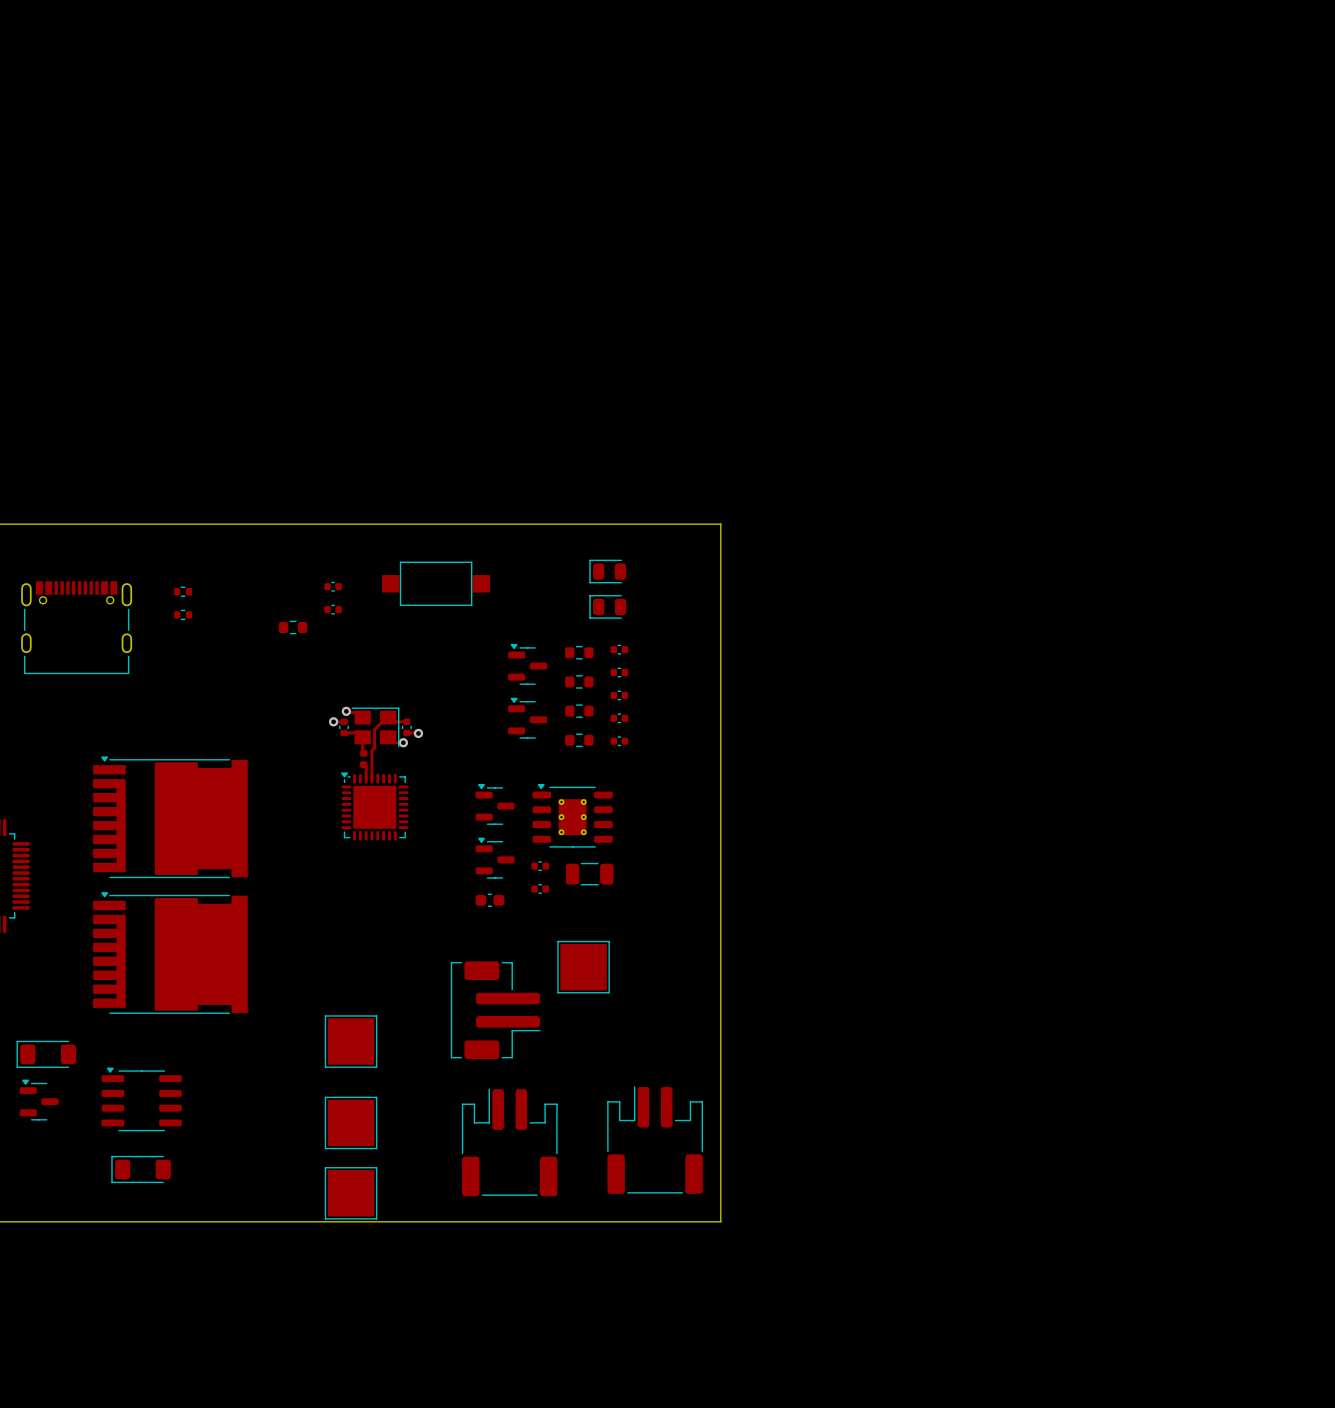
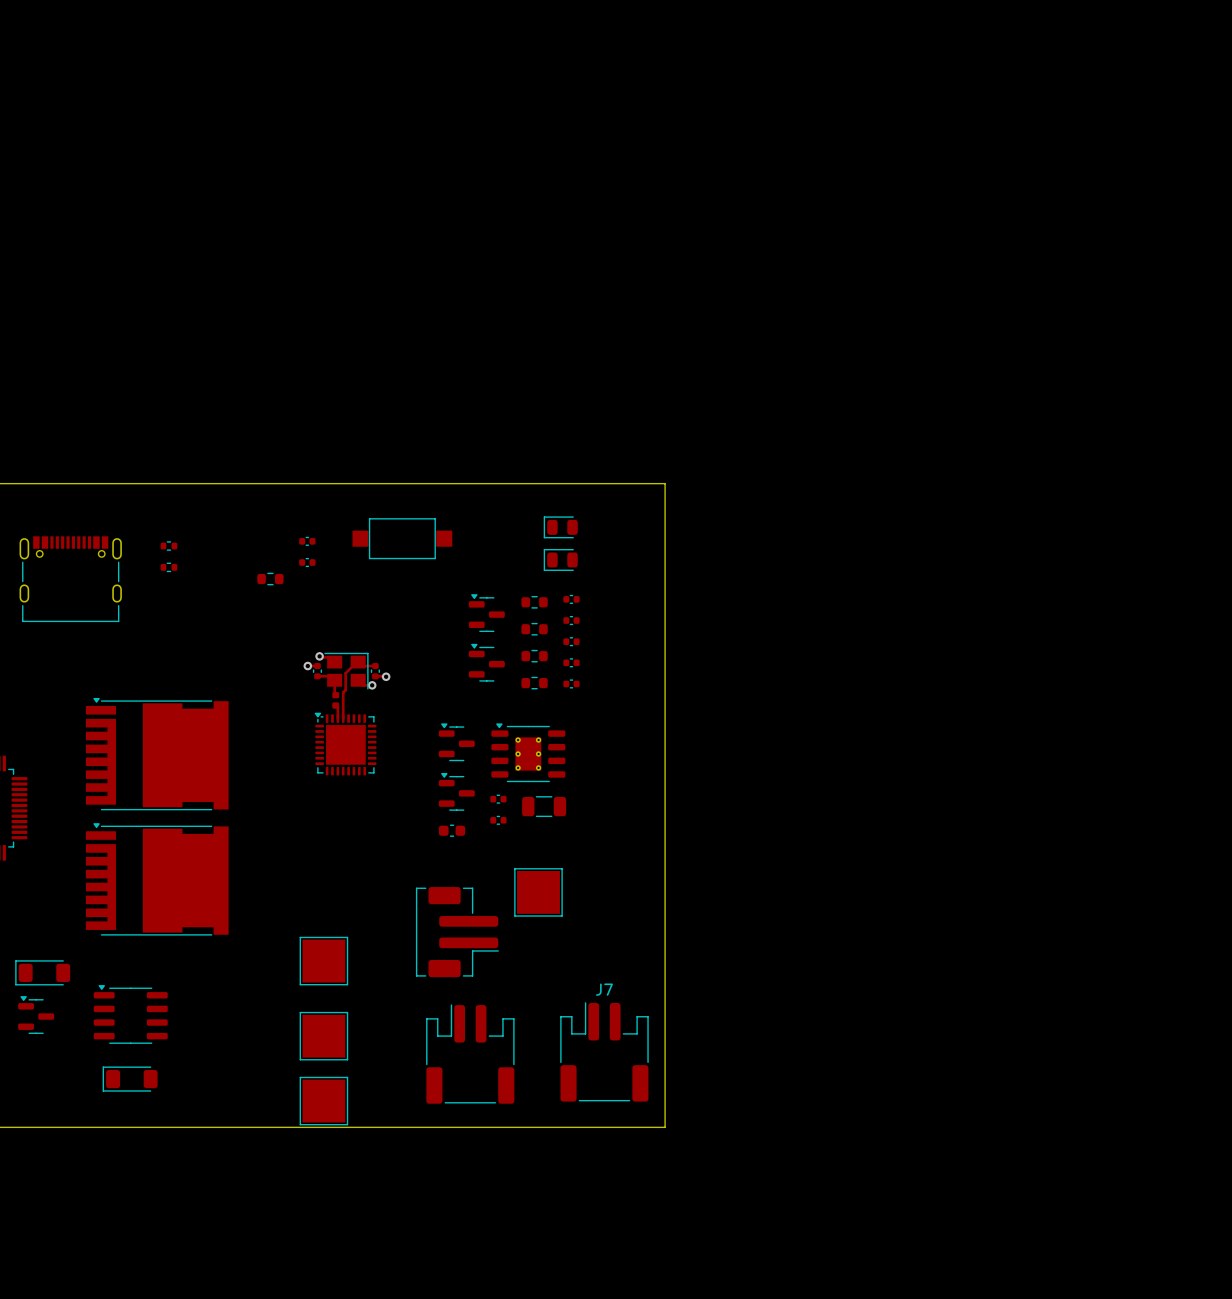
J7 name: none -> J7 (604, 989)

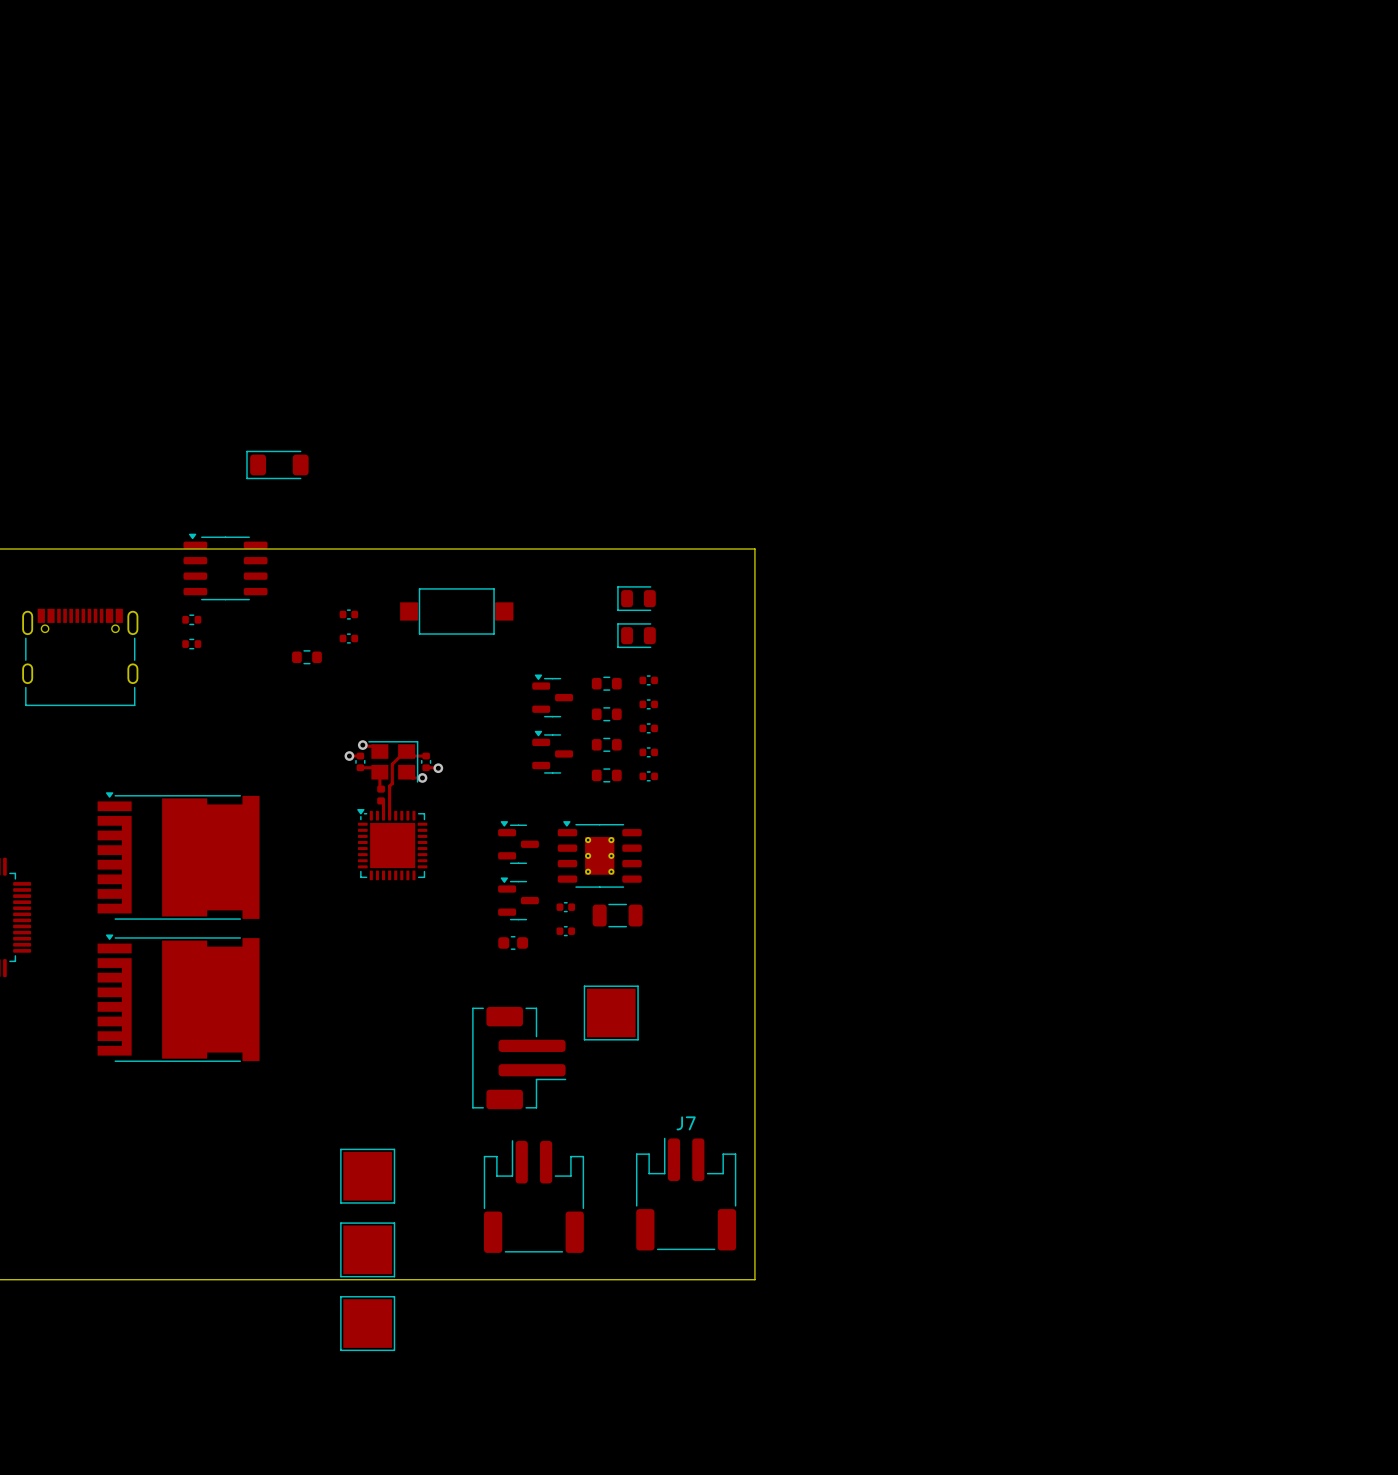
part: none -> (277, 464)
part: none -> (225, 566)
part position: (323, 961) -> (367, 1323)
part: (42, 972) -> none
part: (130, 1014) -> none
part: (36, 1015) -> none
part: (130, 1079) -> none

